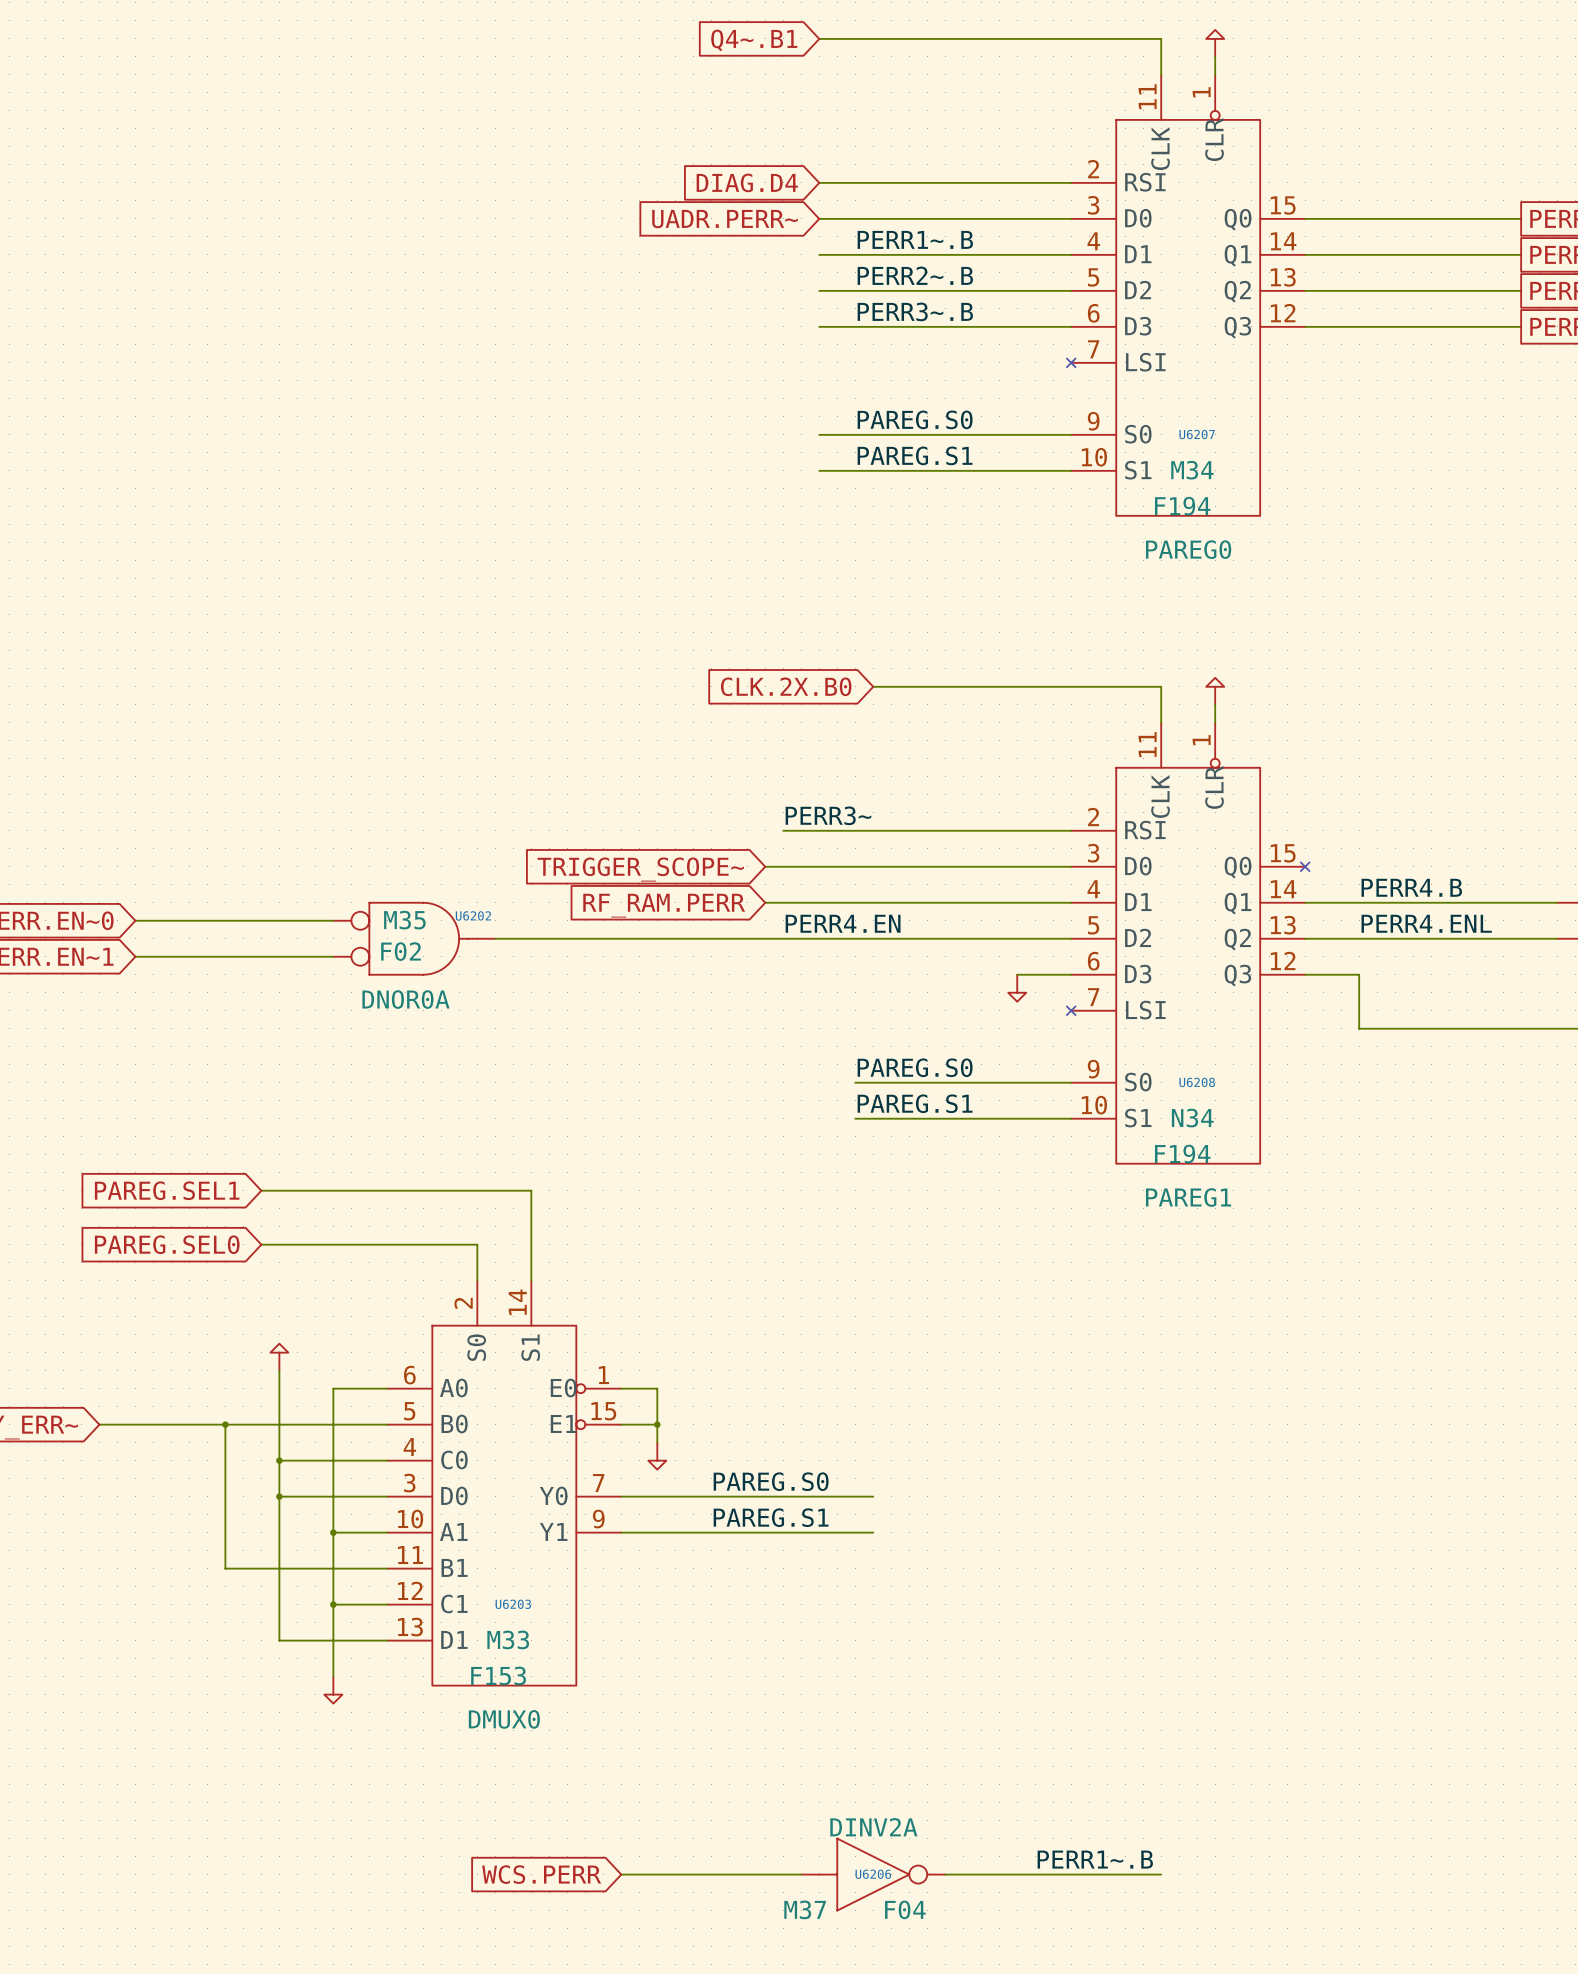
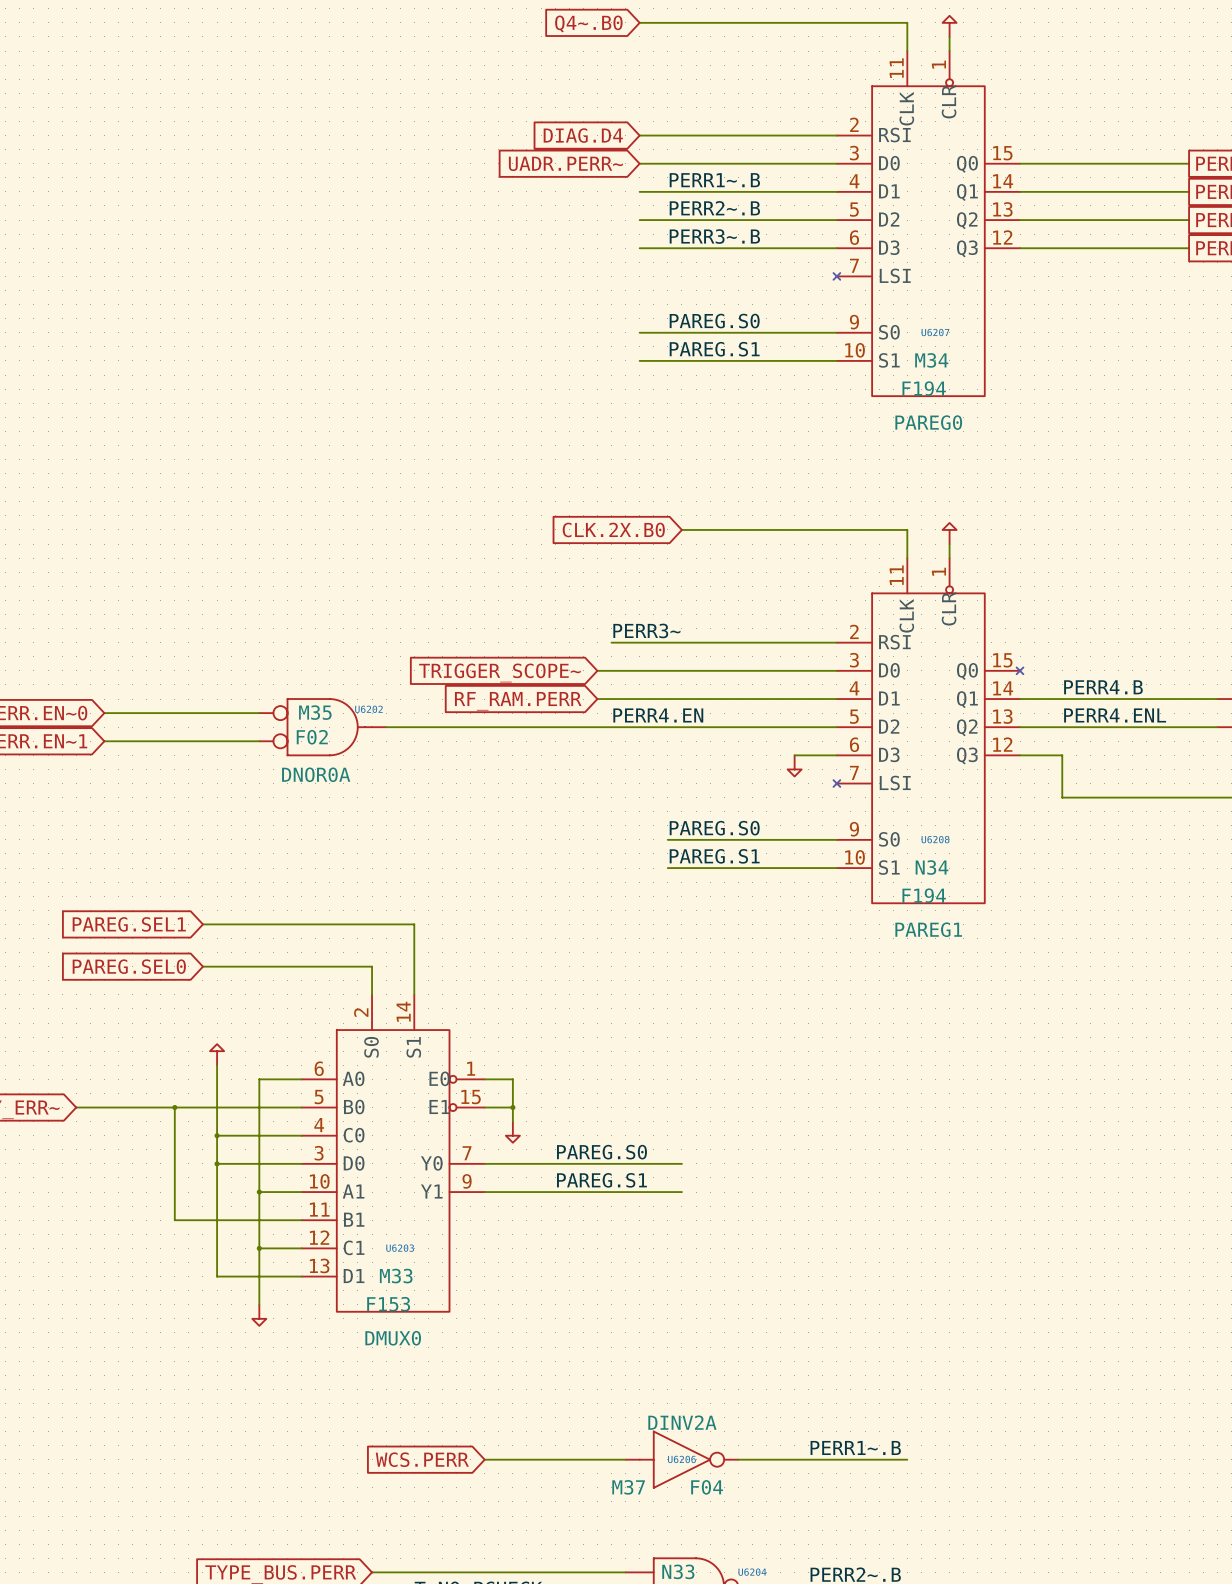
global label: Q4~.B1 (754, 40) -> Q4~.B0 (588, 24)

